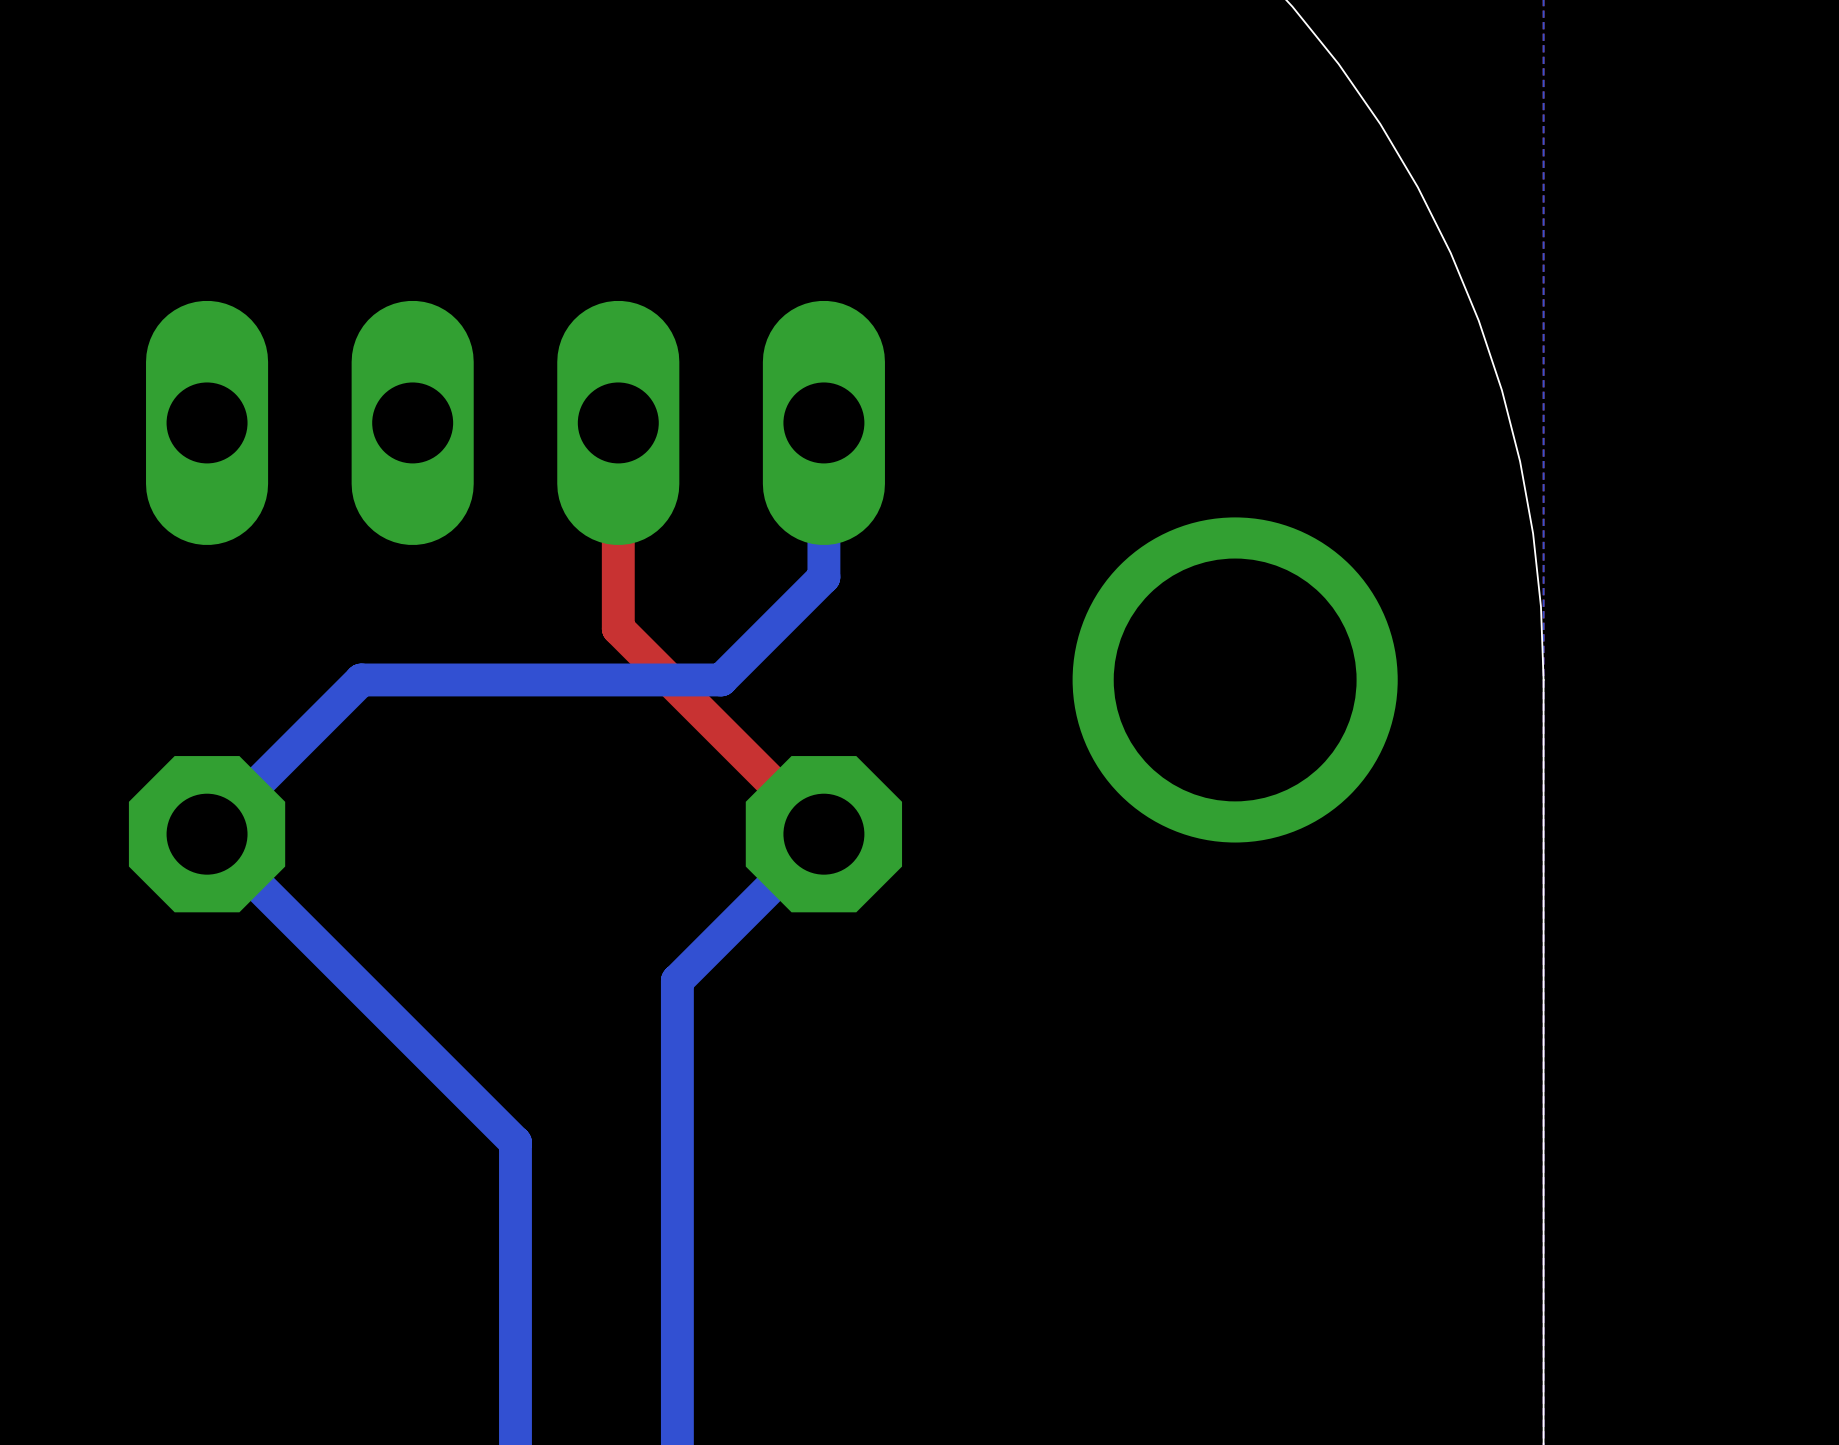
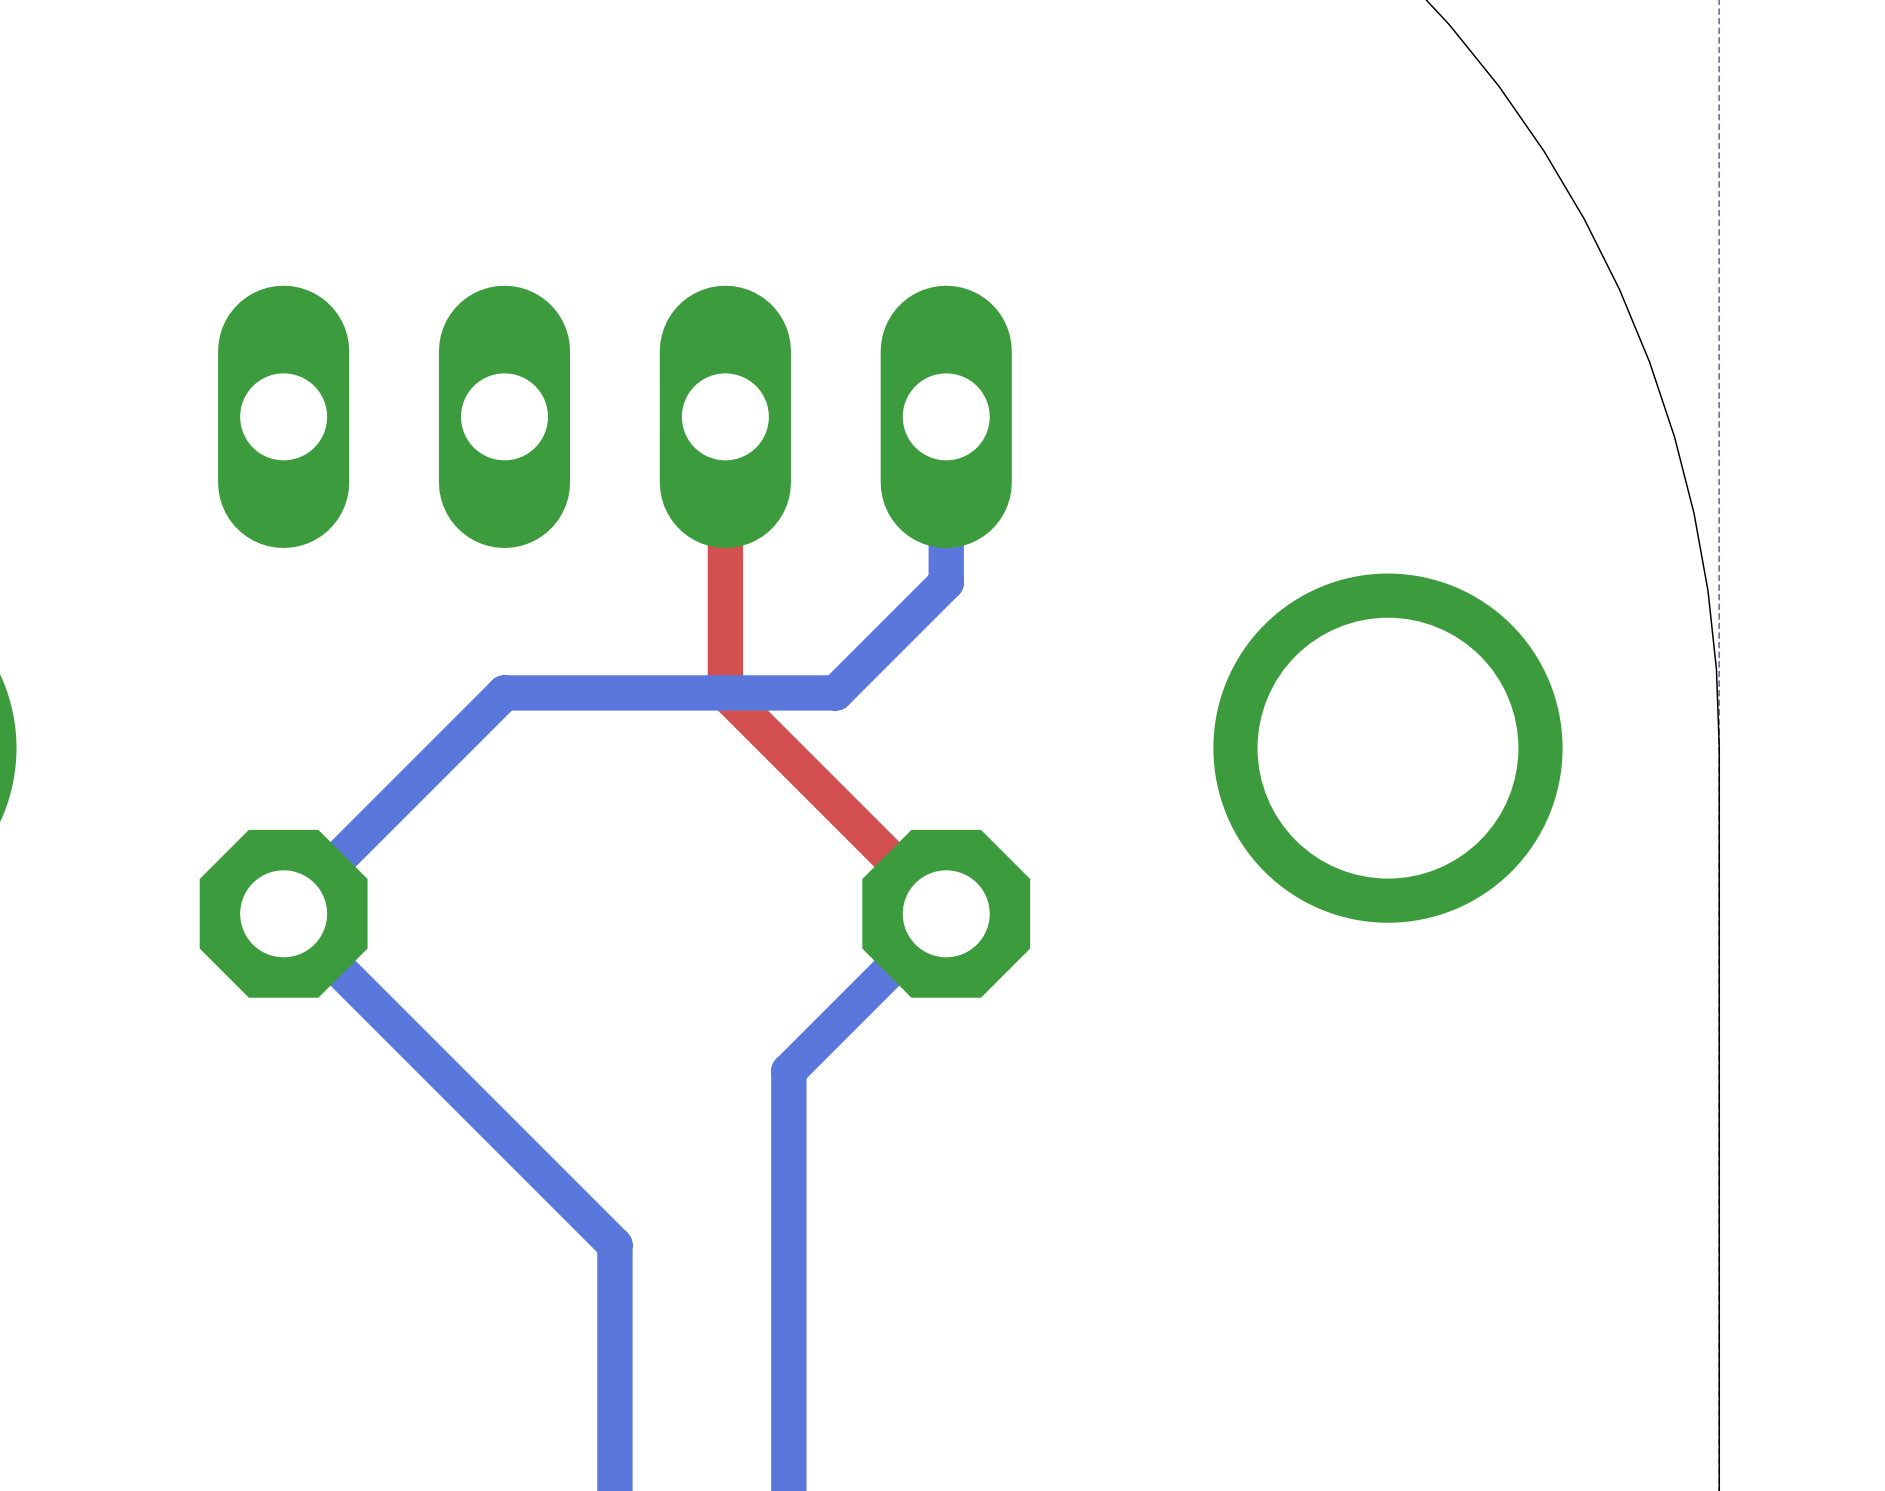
part position: (515, 422) -> (614, 416)
bottom track: (823, 525) (823, 577) (721, 679) (361, 679) -> (946, 582) (835, 692) (504, 692) (449, 748)

